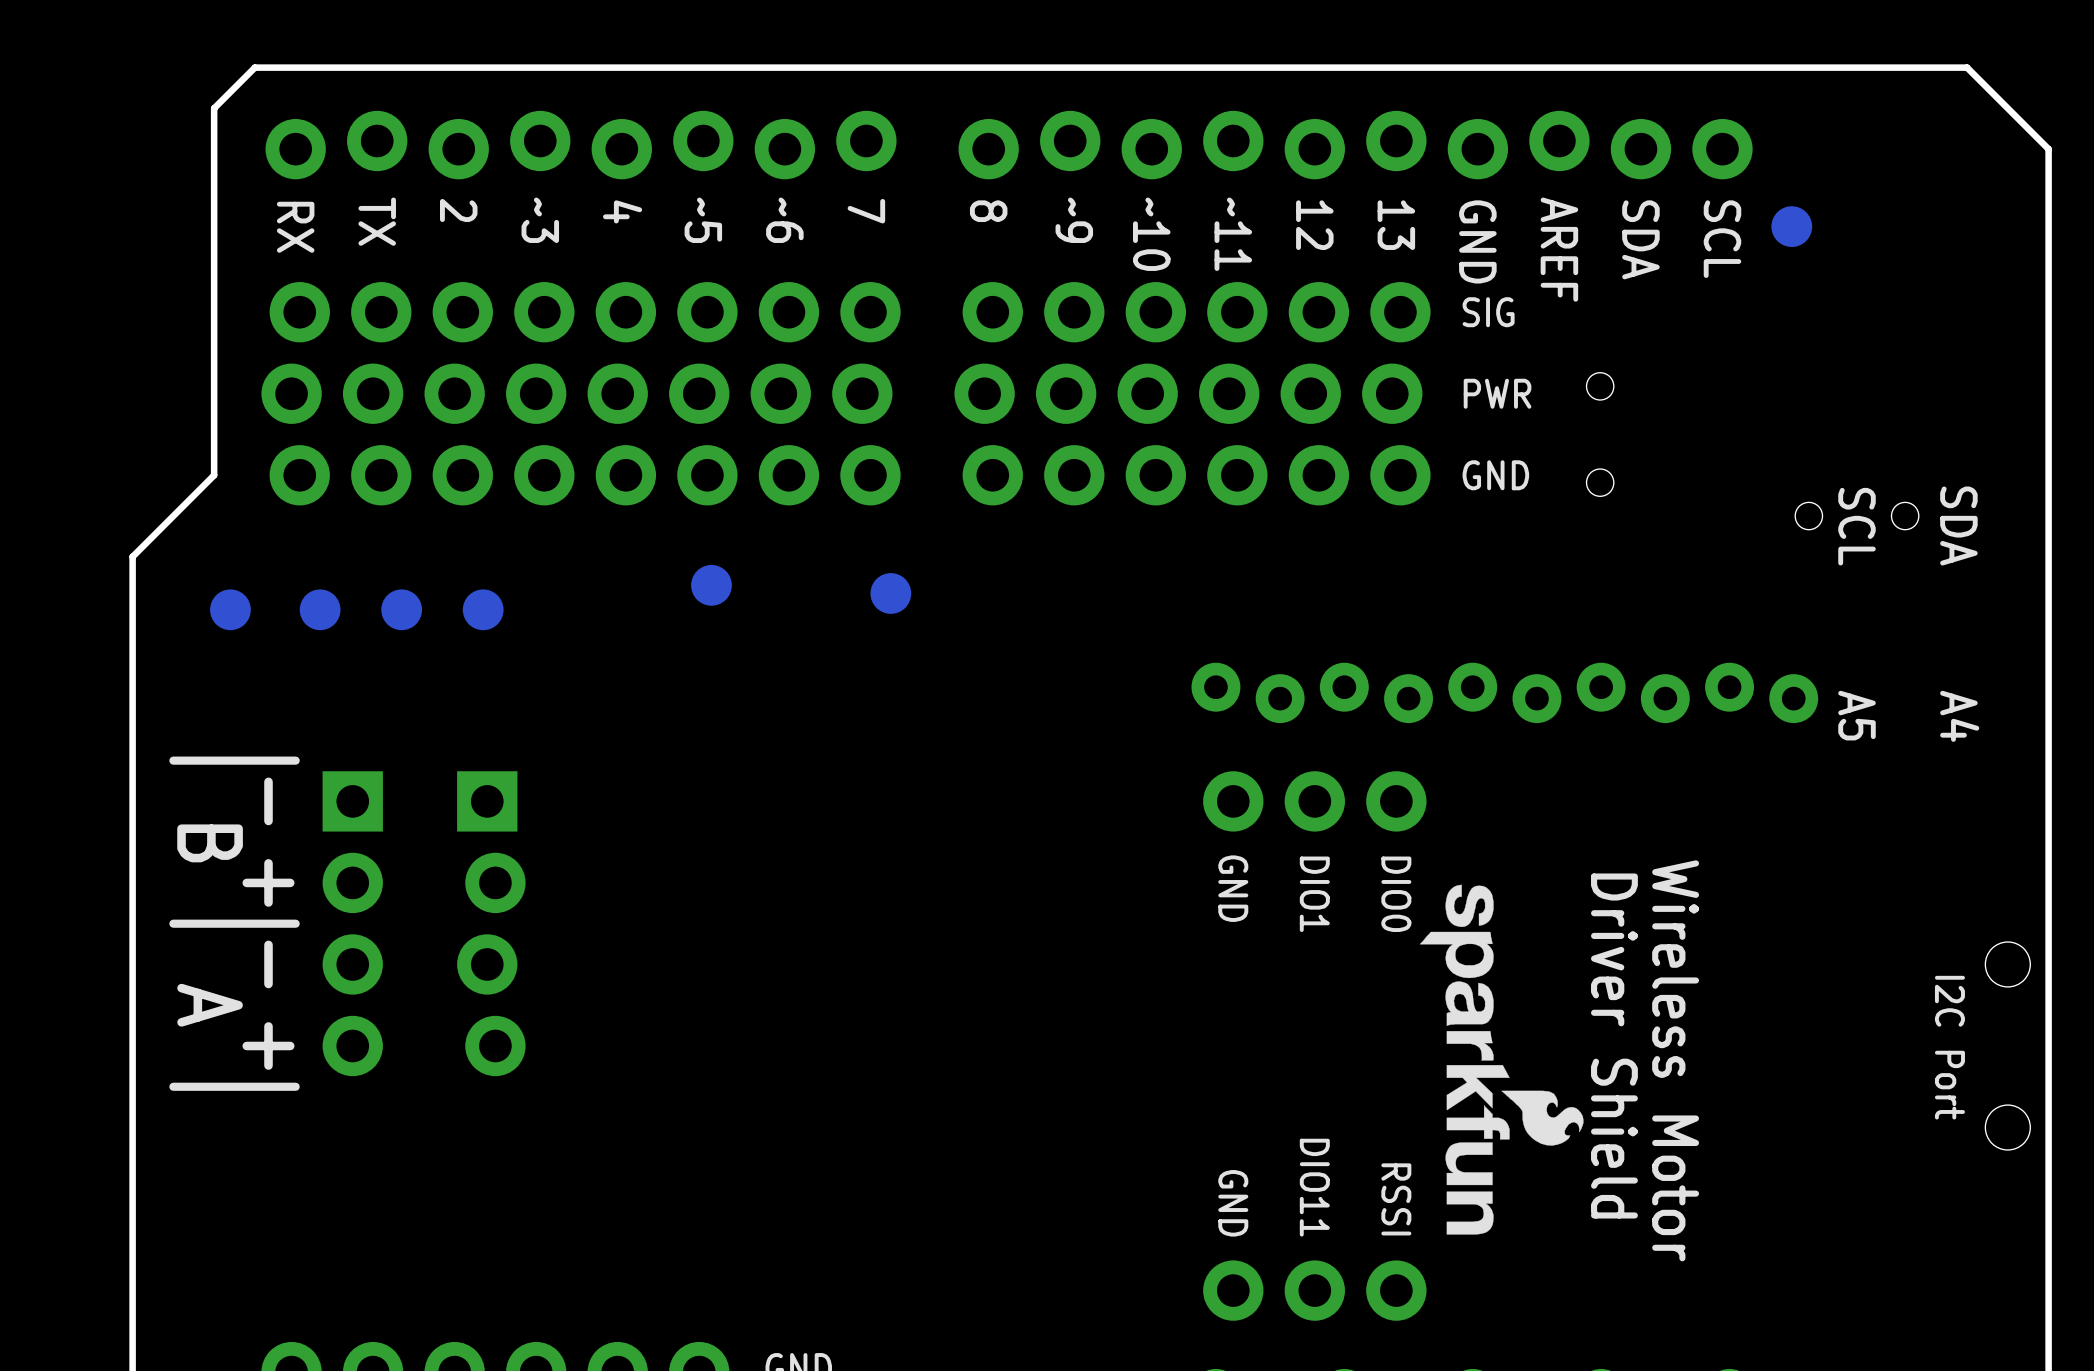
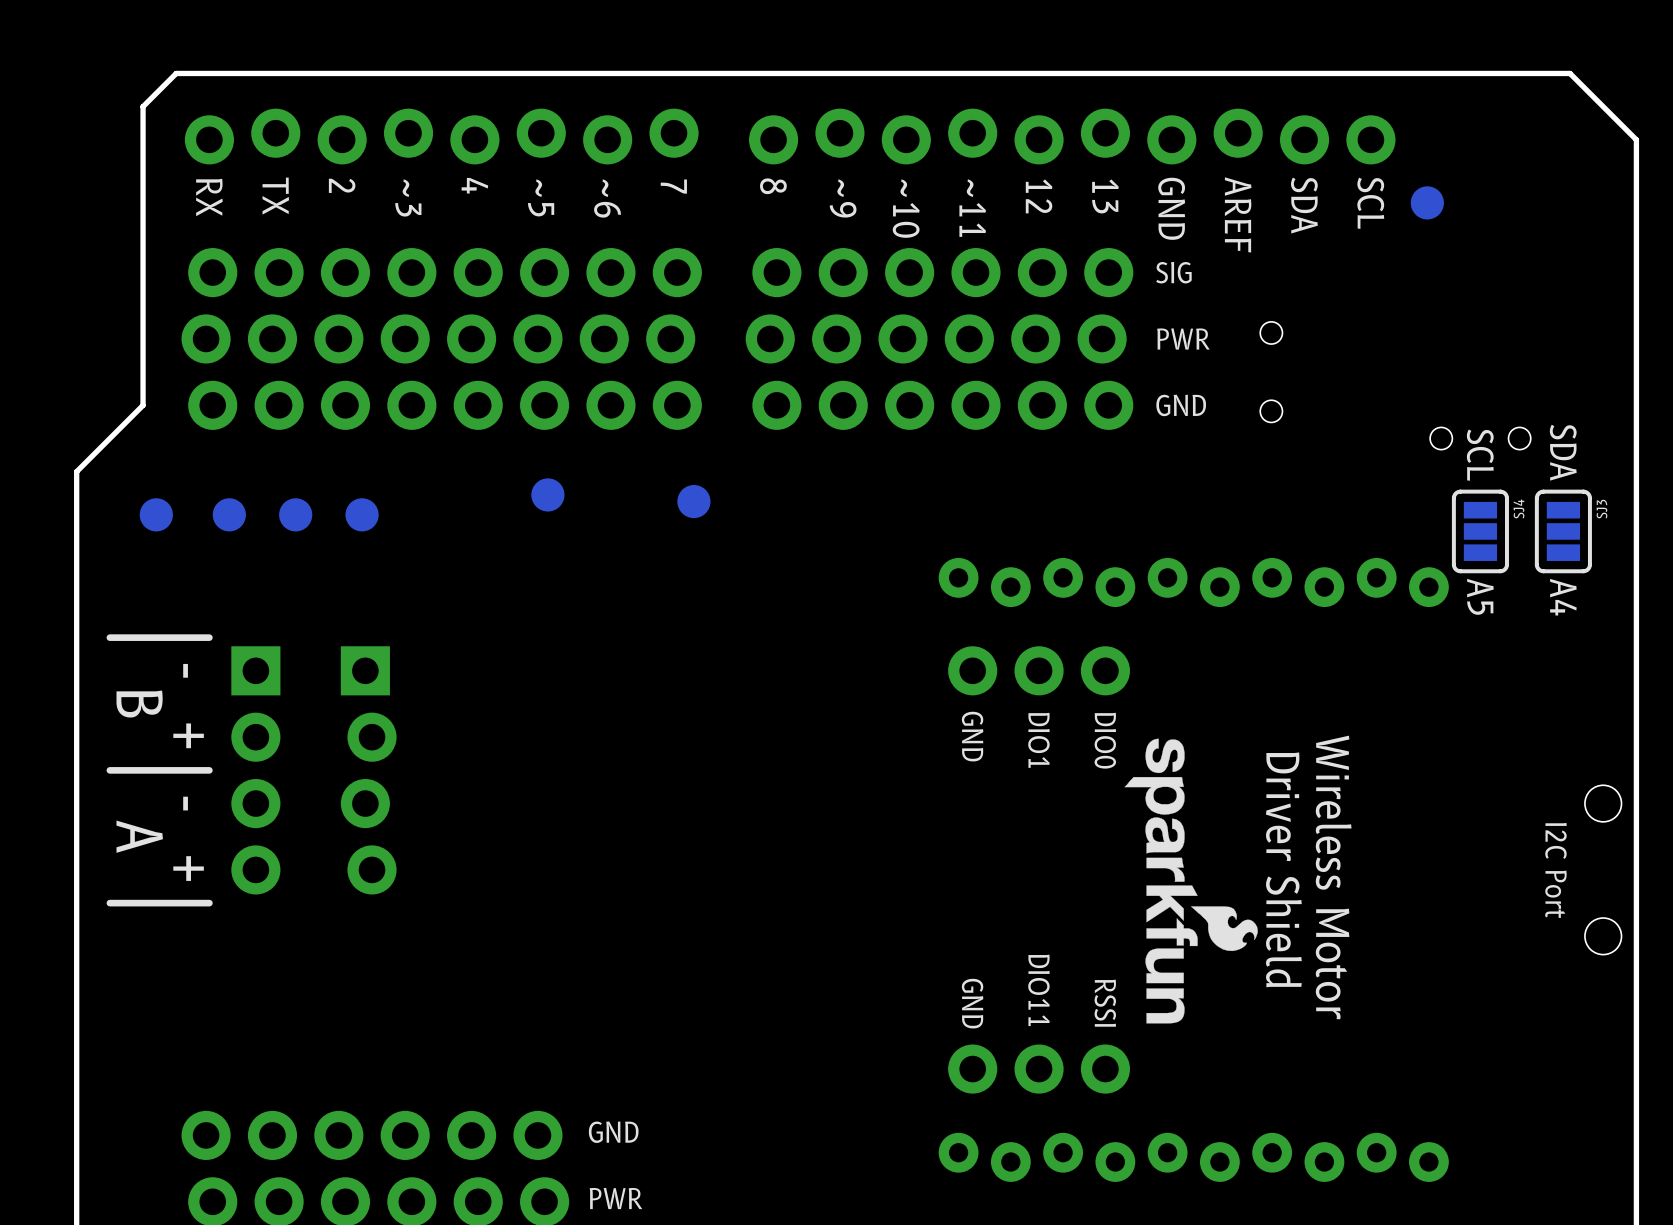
SJ4: none -> (1480, 531)
SJ3: none -> (1563, 531)

